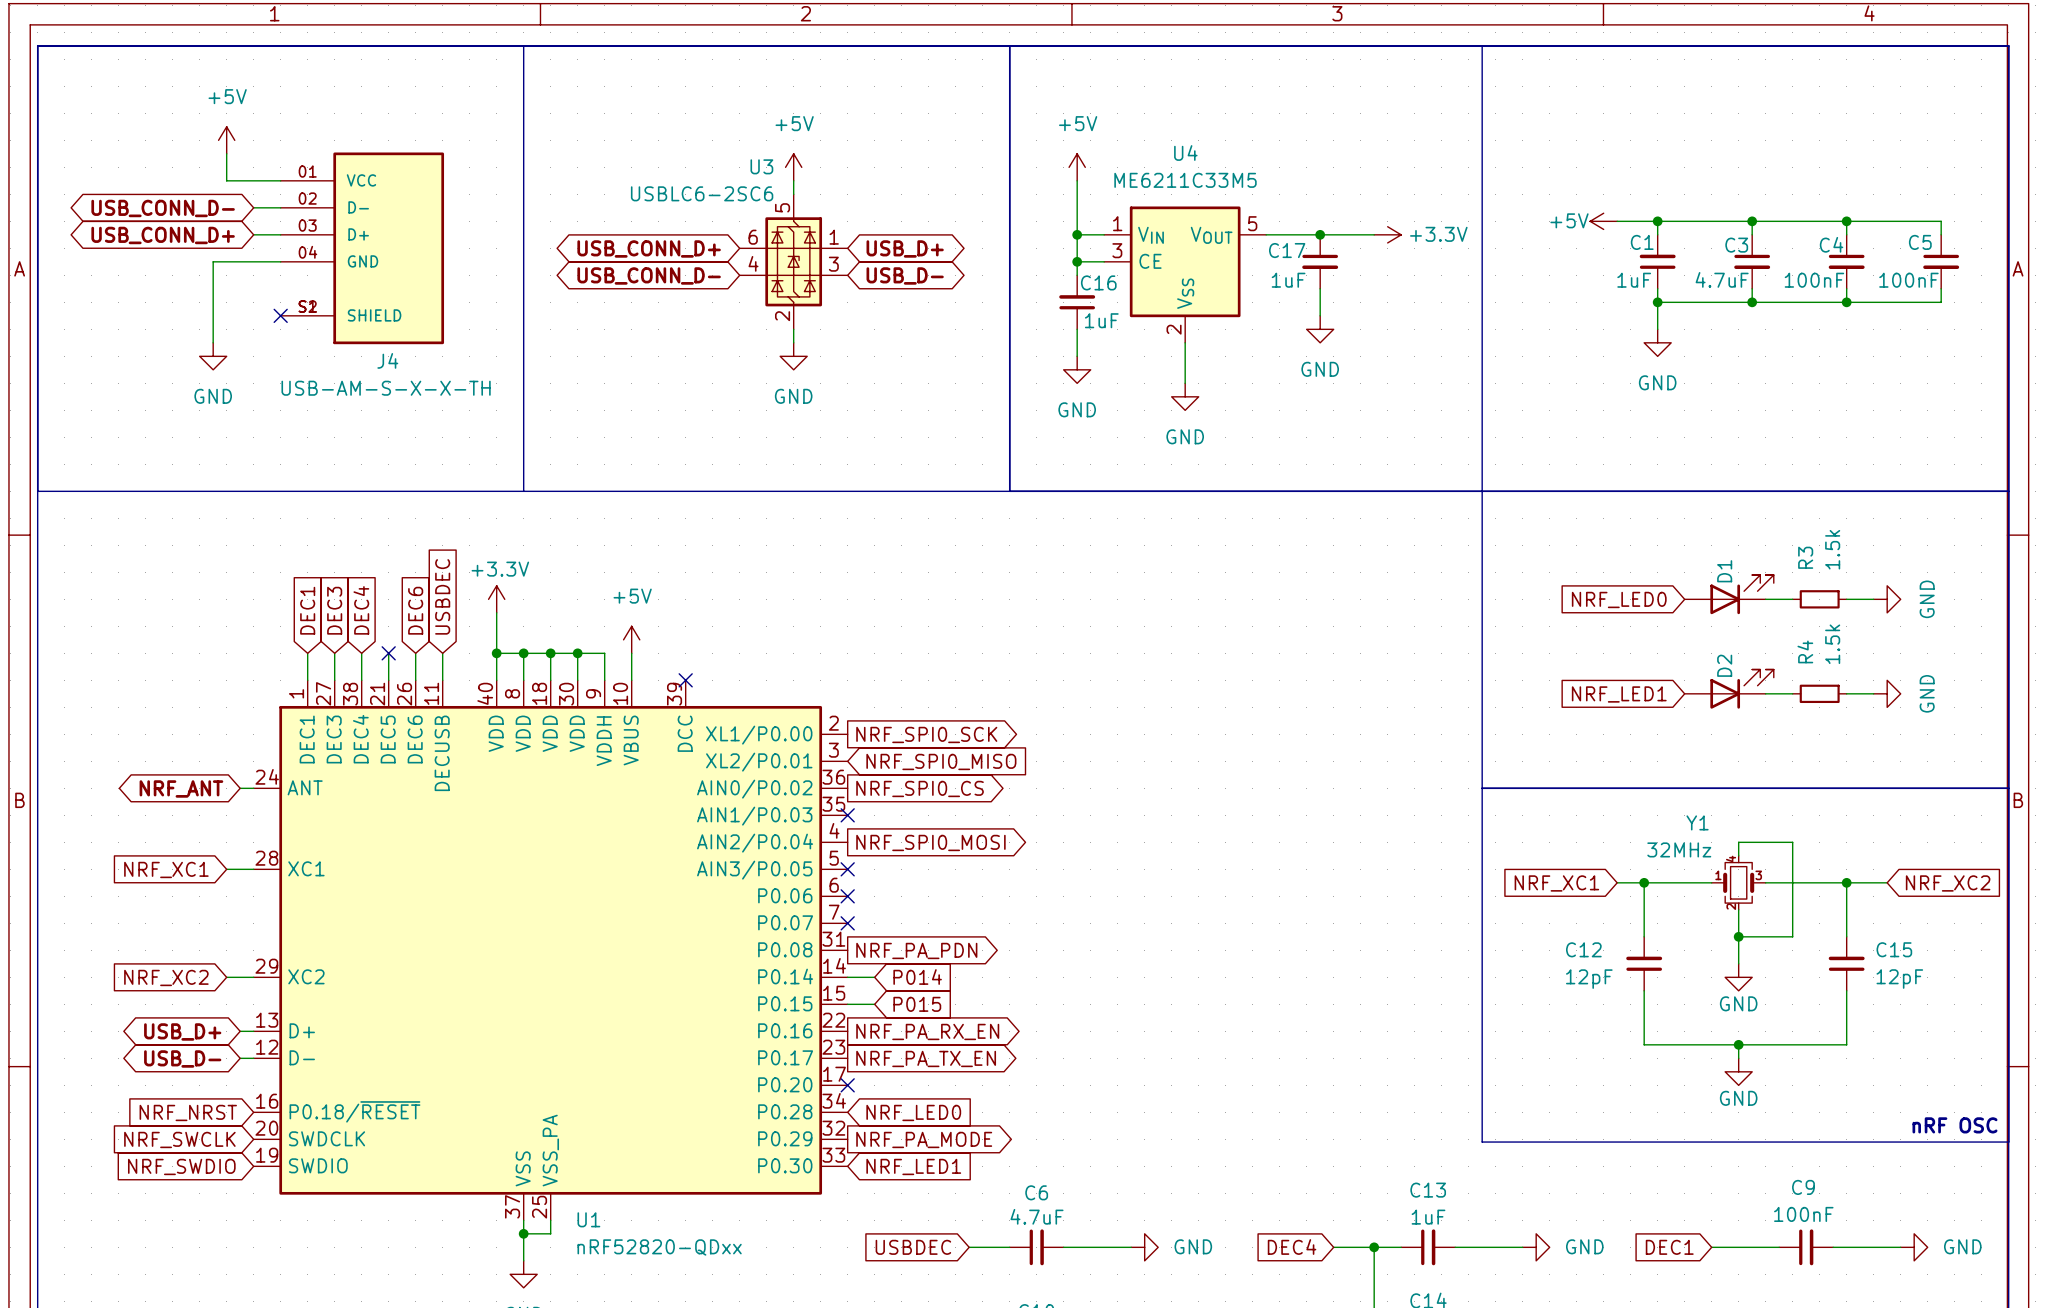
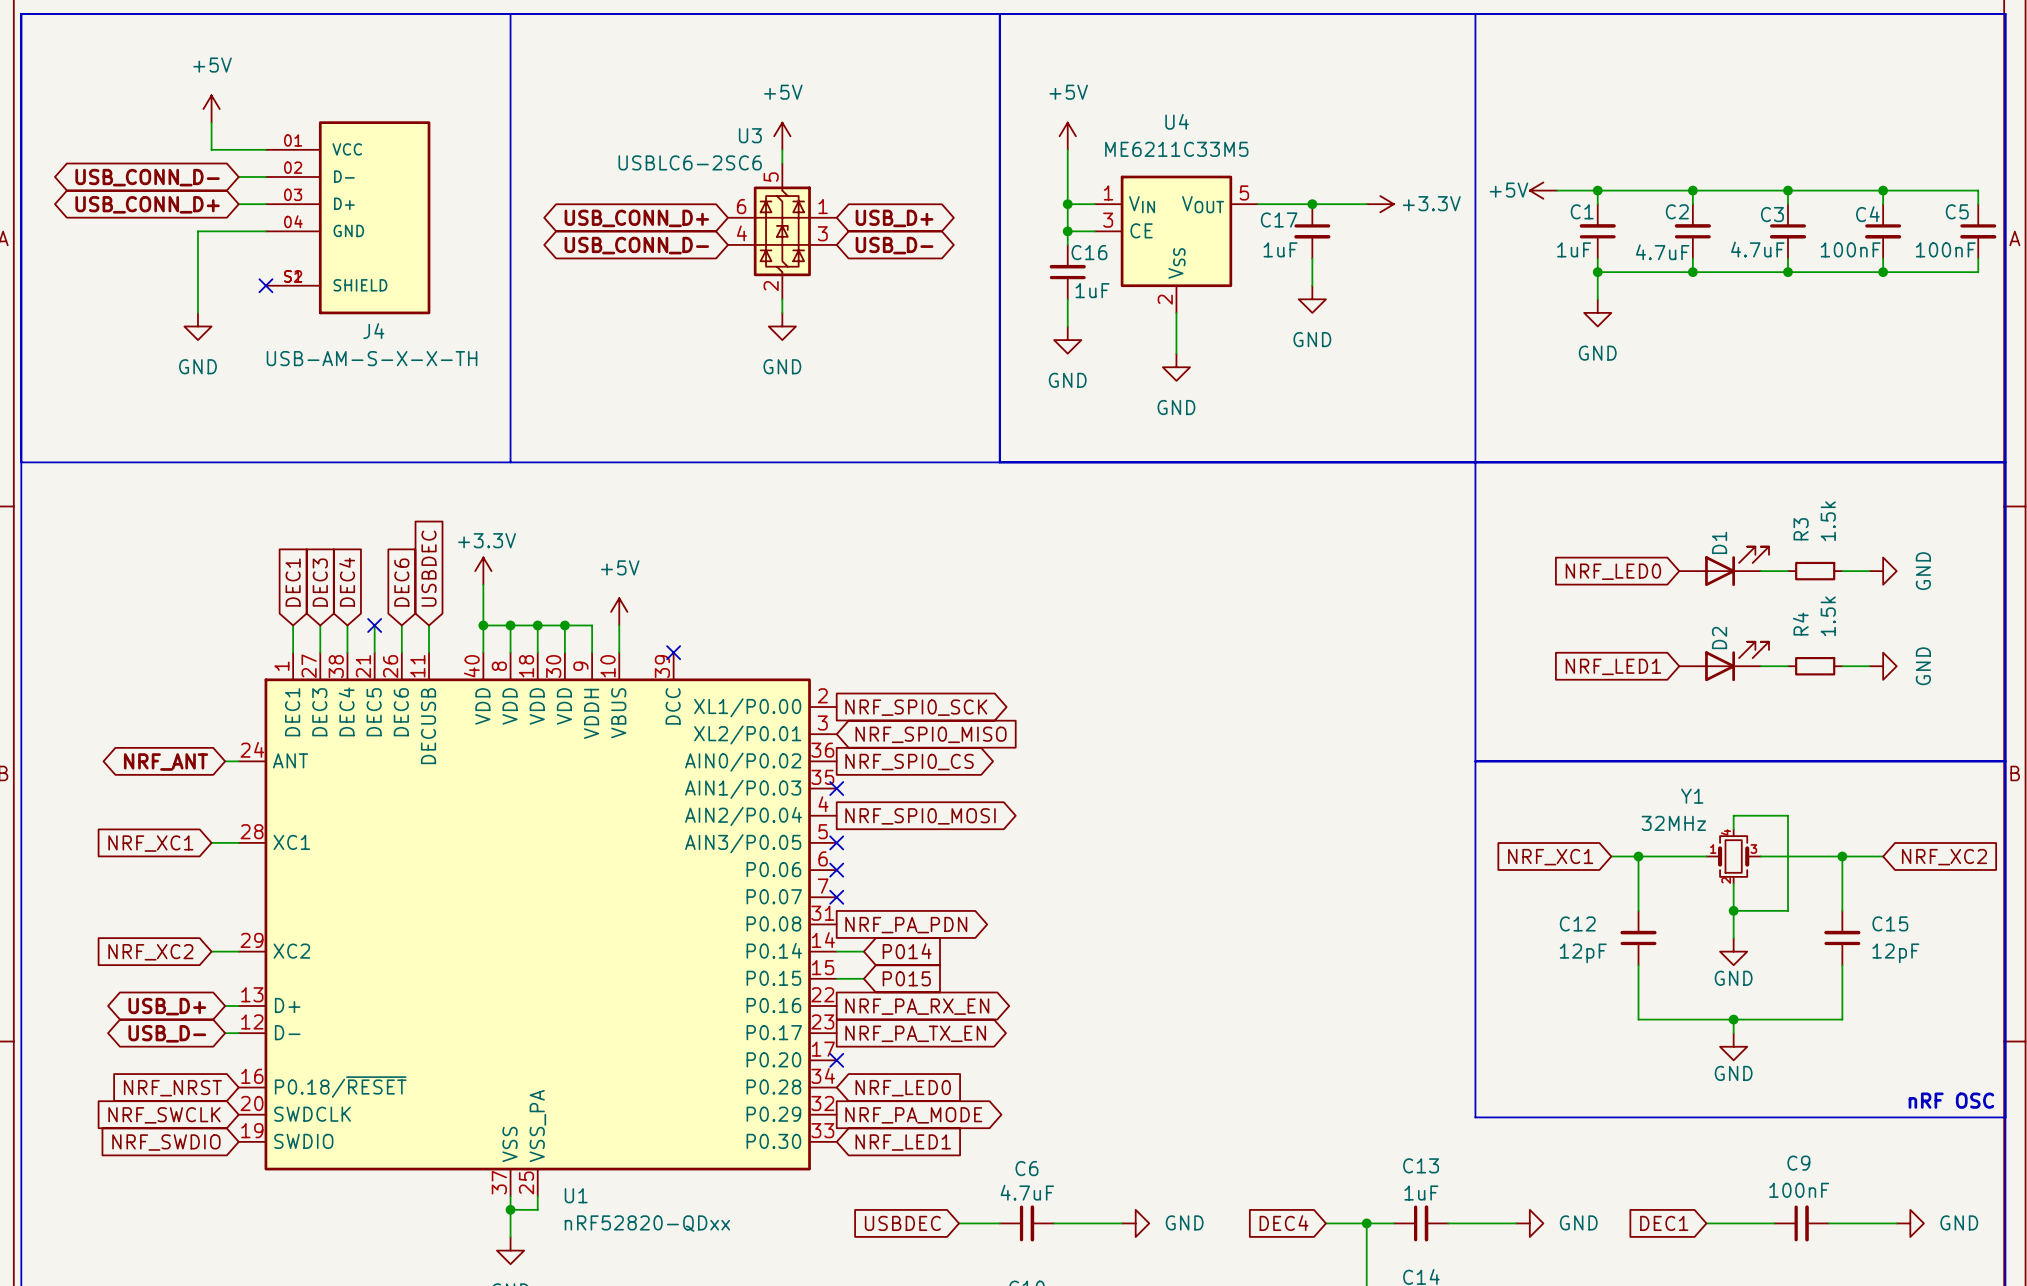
junction: none -> (1597, 190)
power symbol position: +5V (1603, 221) -> +5V (1543, 190)
wire: (1657, 221) (1657, 234) -> (1597, 190) (1597, 204)
junction: (1657, 221) -> none
junction: none -> (1692, 190)
wire: (1752, 221) (1752, 234) -> (1692, 190) (1692, 204)
junction: (1752, 221) -> none
junction: none -> (1788, 190)
wire: (1846, 221) (1846, 234) -> (1788, 190) (1788, 204)
junction: (1846, 221) -> none
wire: none -> (1883, 190) (1883, 204)
junction: none -> (1883, 190)
wire: (1941, 221) (1941, 234) -> (1937, 190) (1978, 190) (1978, 204)
C1 position: (1657, 261) -> (1597, 231)
C2: none -> 4.7uF (1692, 231)
C3 position: (1752, 261) -> (1788, 231)
C4 position: (1846, 261) -> (1883, 231)
C5 position: (1941, 261) -> (1978, 231)
wire: (1657, 288) (1657, 329) -> (1597, 258) (1597, 299)
wire: (1752, 288) (1752, 302) -> (1692, 258) (1692, 272)
wire: (1846, 288) (1846, 302) -> (1788, 258) (1788, 272)
wire: none -> (1883, 258) (1883, 272)
wire: (1941, 288) (1941, 302) -> (1978, 258) (1978, 272) (1937, 272)
wire: none -> (1597, 272) (1652, 272)
junction: none -> (1597, 272)
junction: (1657, 302) -> none
junction: none -> (1692, 272)
junction: (1752, 302) -> none
junction: none -> (1788, 272)
junction: (1846, 302) -> none
junction: none -> (1883, 272)
power symbol position: GND (1657, 342) -> GND (1597, 312)

